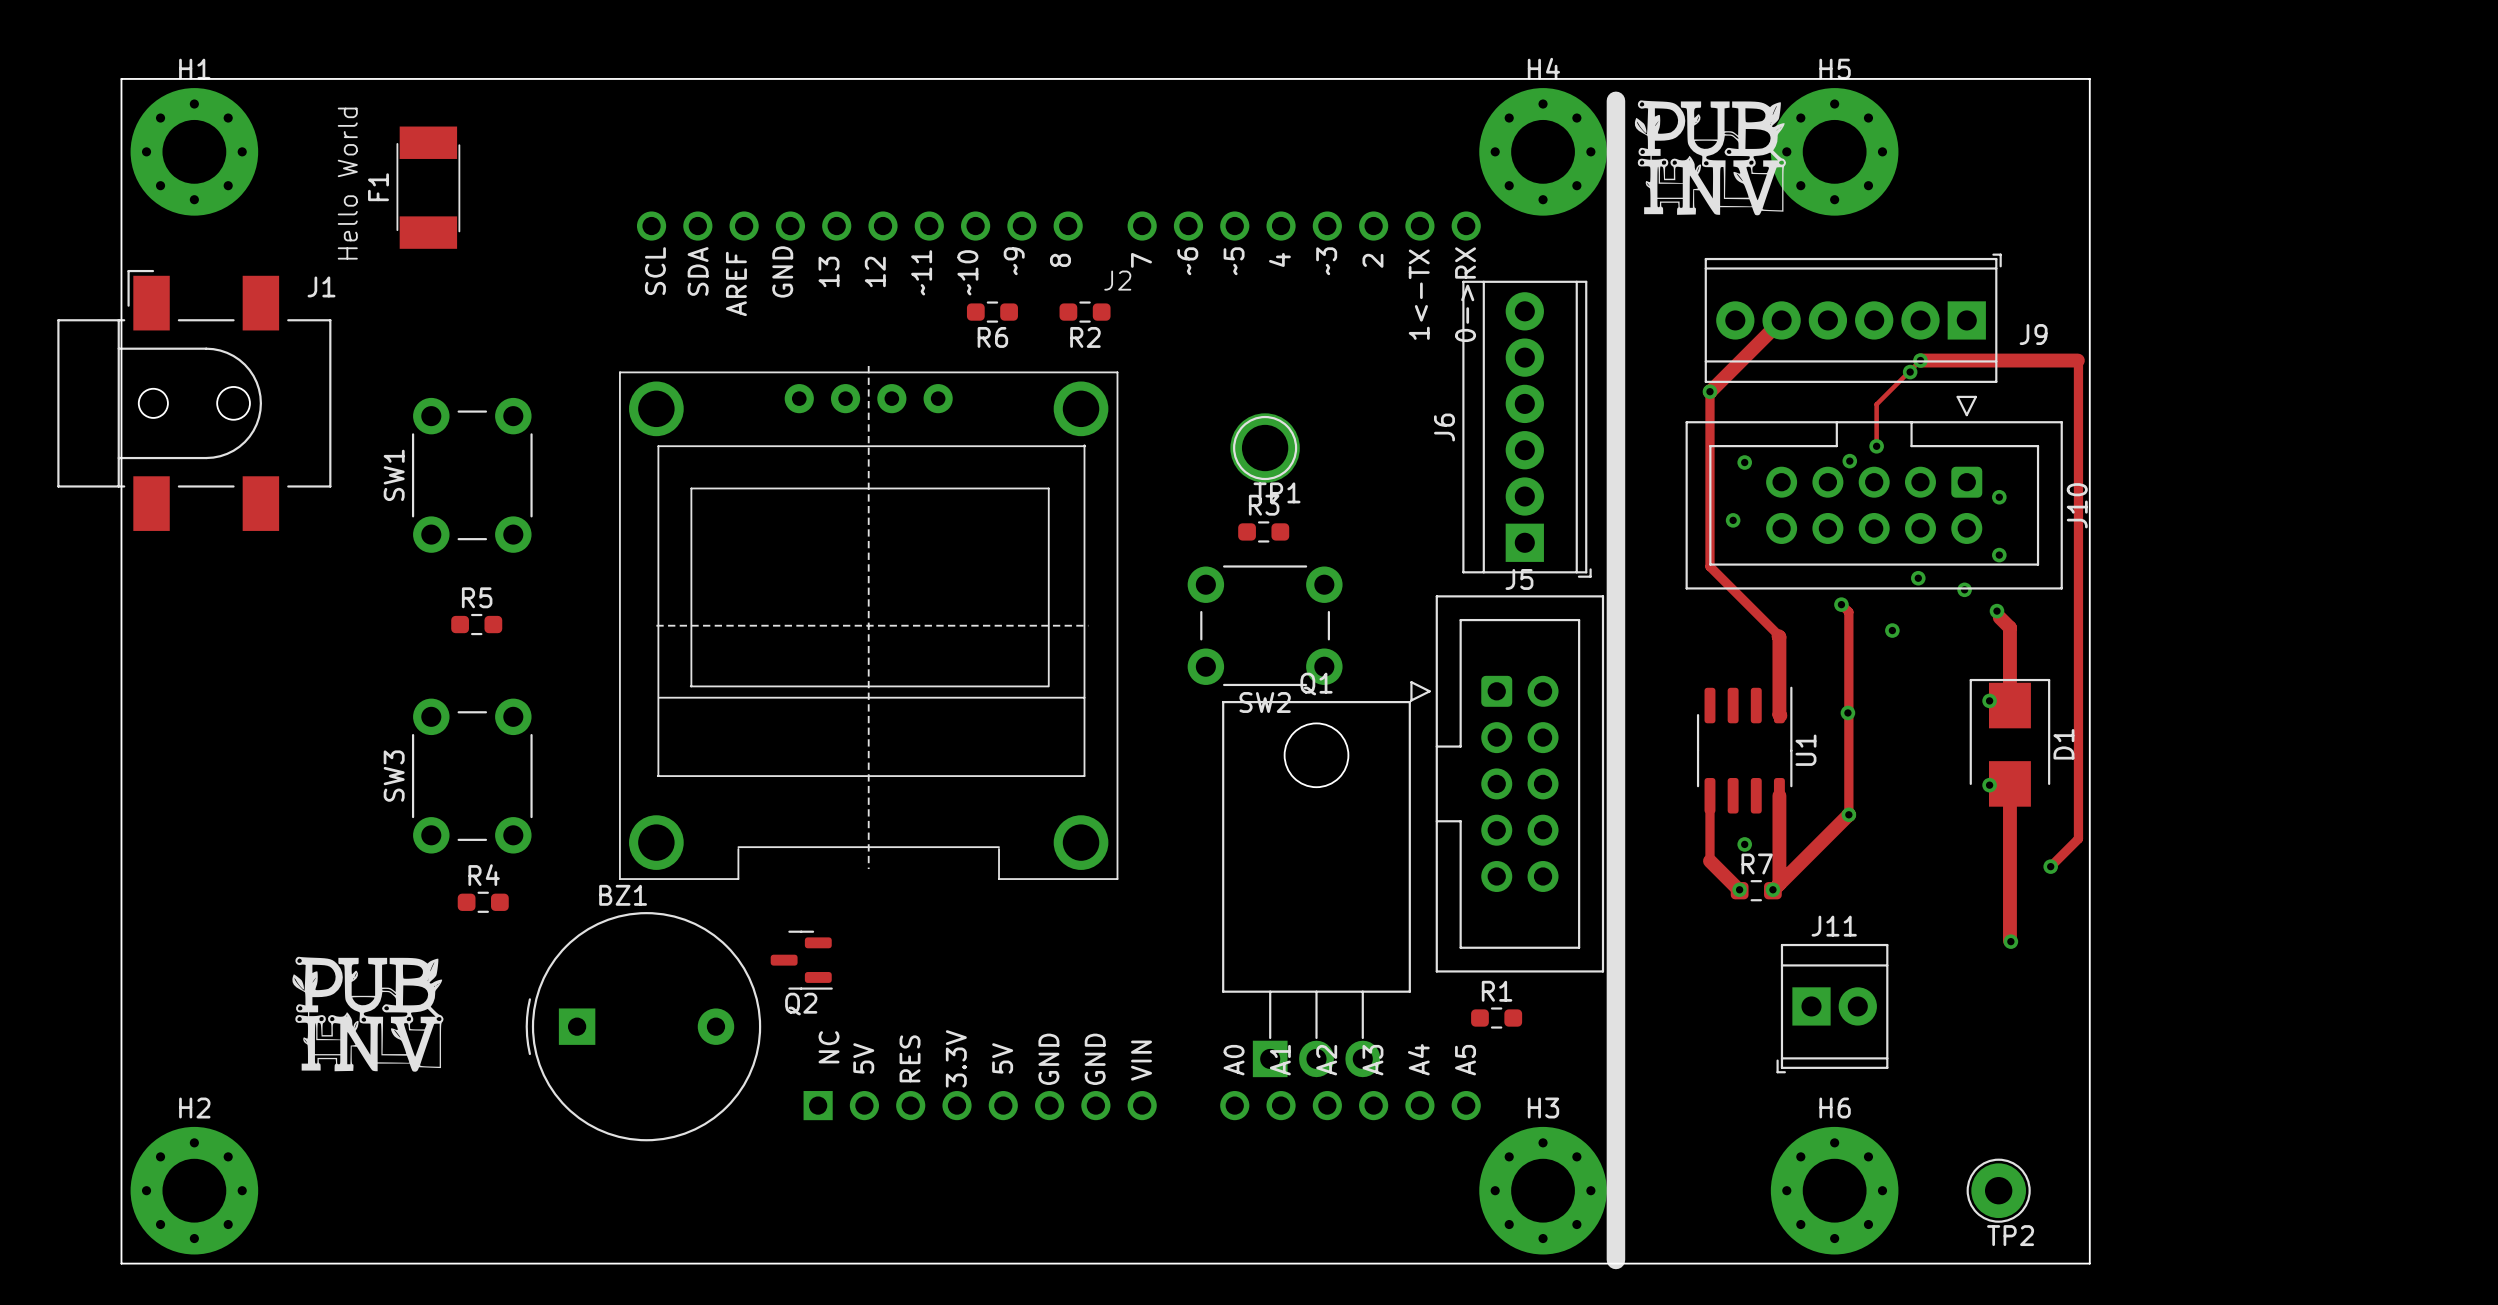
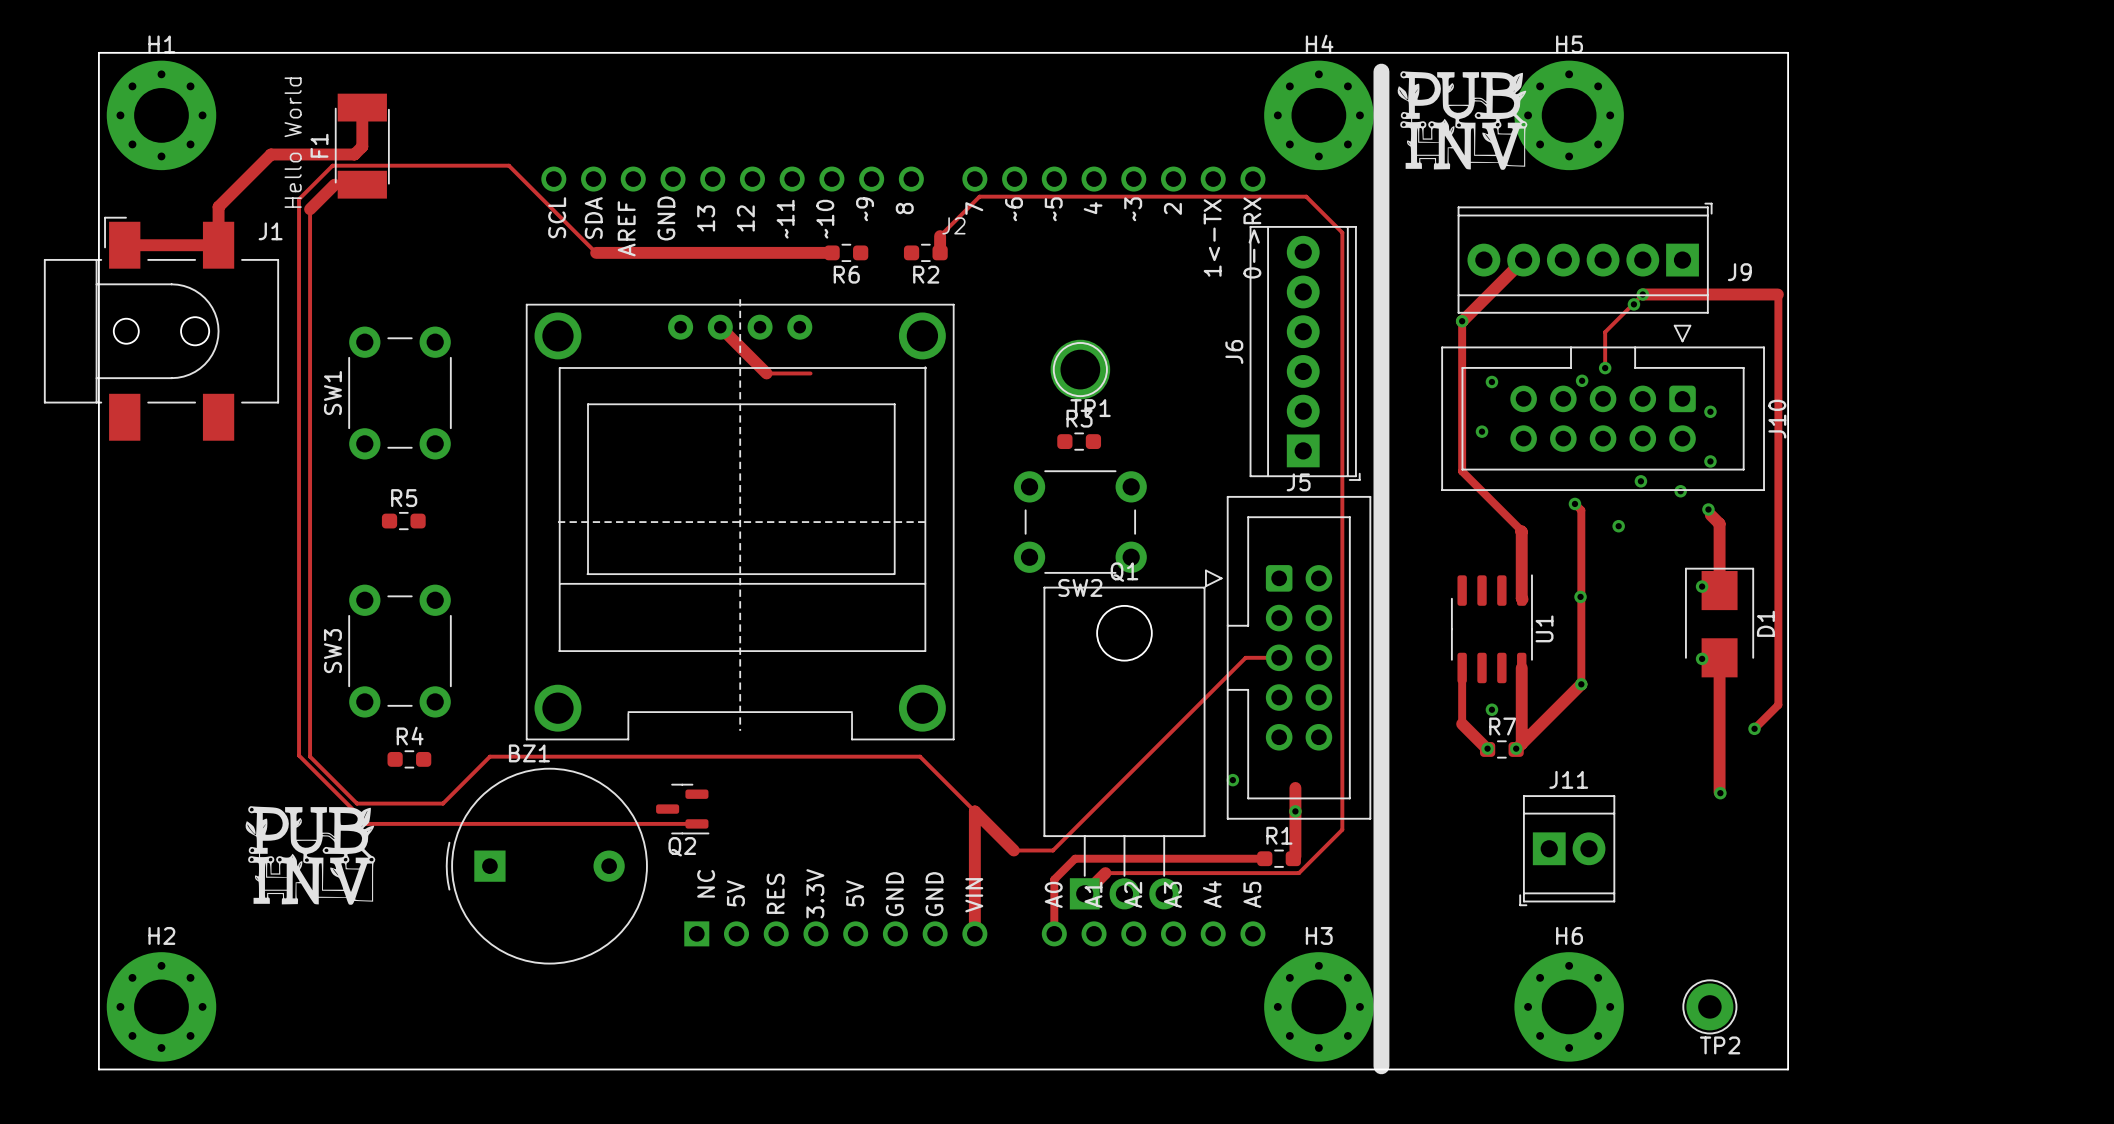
track: none -> (362, 107) (362, 146) (354, 154) (270, 154) (218, 206) (218, 245) (124, 245)
track: none -> (362, 184) (334, 184) (310, 209) (310, 756) (356, 803) (443, 803) (489, 756) (920, 756) (974, 811)
track: none -> (832, 252) (596, 252) (508, 165) (332, 165) (299, 199) (299, 755) (367, 823) (696, 823)
track: none -> (940, 252) (940, 236) (979, 196) (1306, 196) (1342, 232) (1342, 829) (1298, 873) (1105, 873) (1084, 893)
track: none -> (720, 327) (766, 373) (810, 373)
track: none -> (1279, 657) (1245, 657) (1052, 850) (1013, 850) (974, 811)
via: none -> (1232, 780)
track: none -> (1295, 787) (1295, 856) (1293, 858)
track: none -> (974, 811) (974, 933)
via: none -> (1295, 811)
track: none -> (1264, 858) (1075, 858) (1054, 879) (1054, 933)

